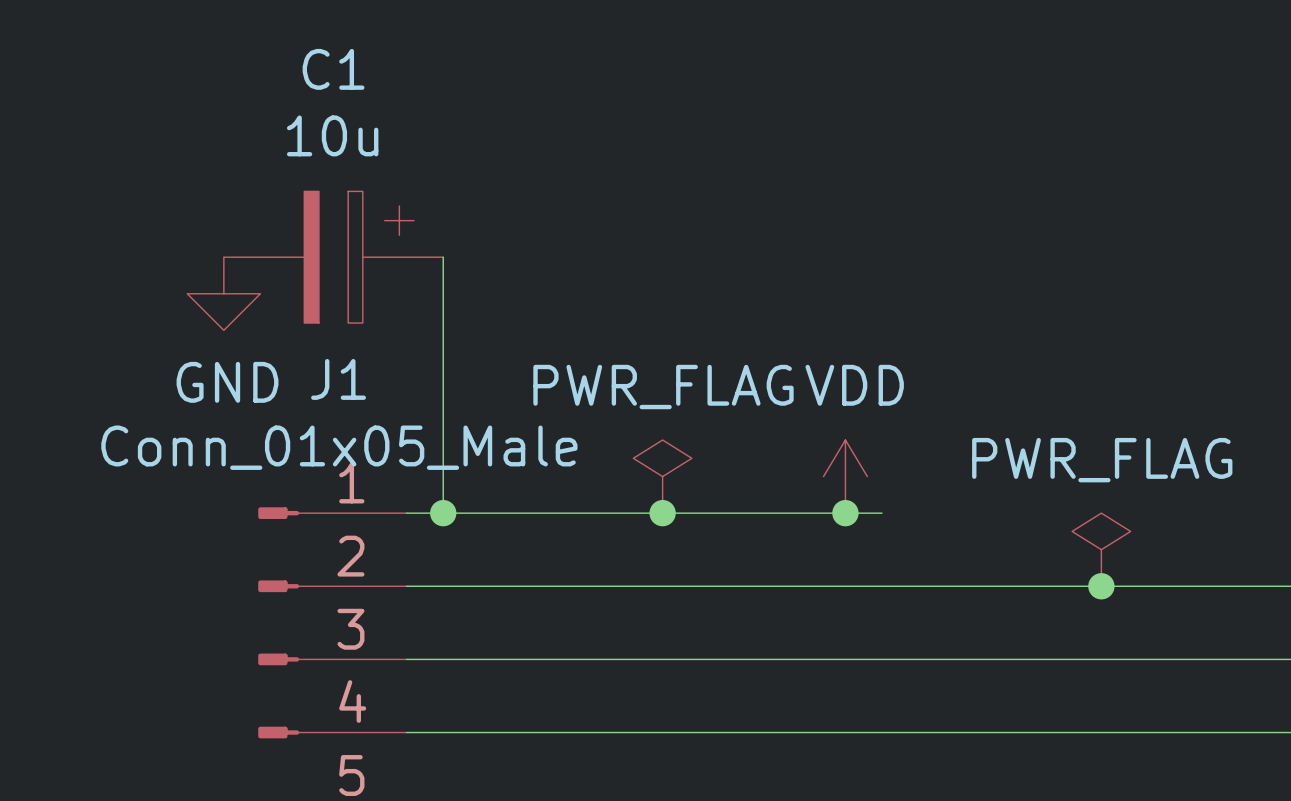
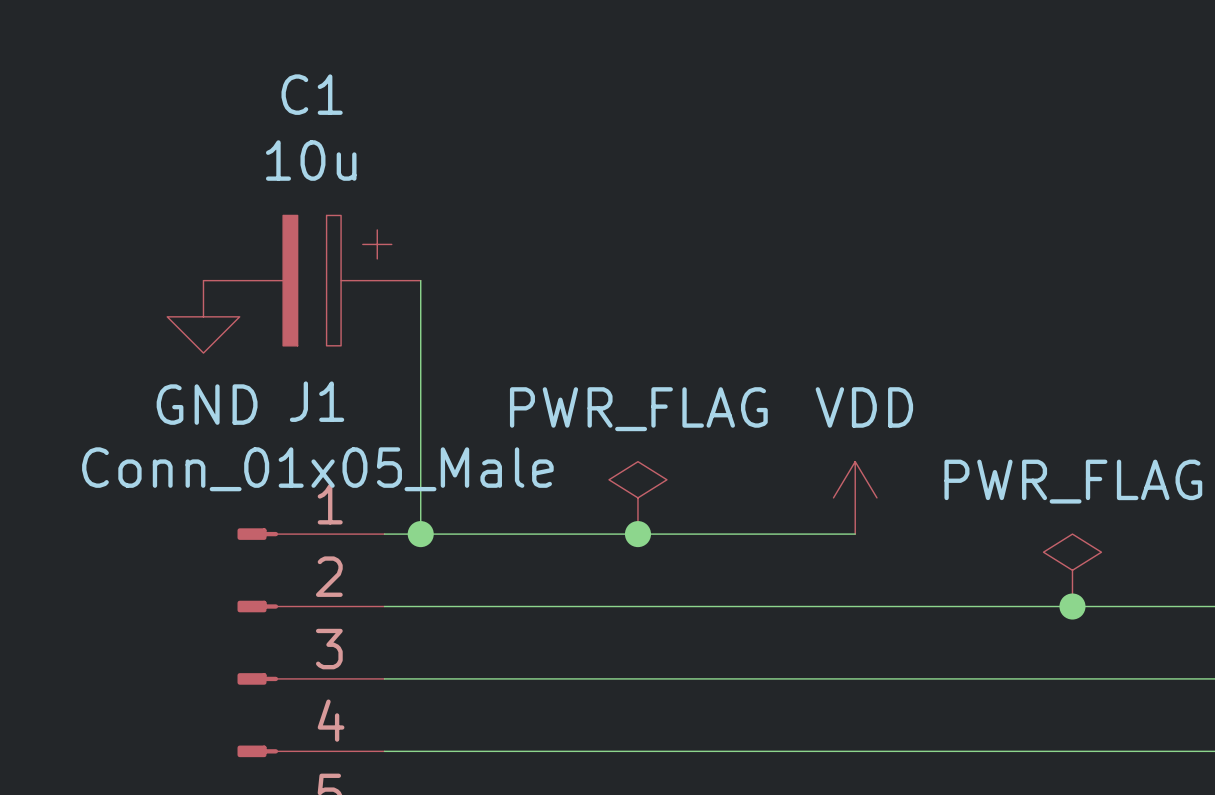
power symbol position: VDD (845, 476) -> VDD (855, 497)
junction: (845, 513) -> none

